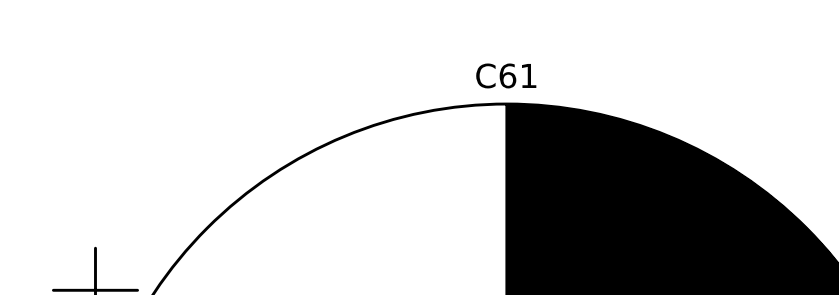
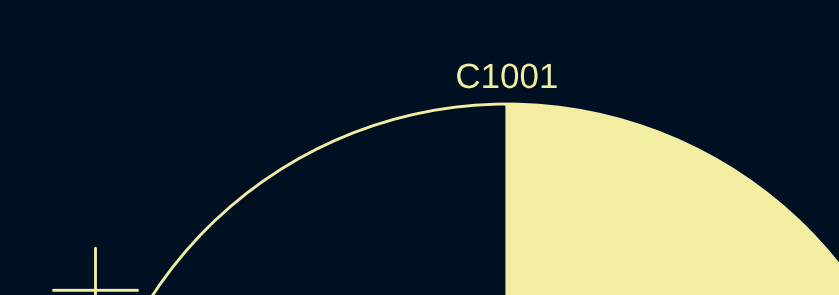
C61 name: C61 (506, 75) -> C1001 (506, 75)

